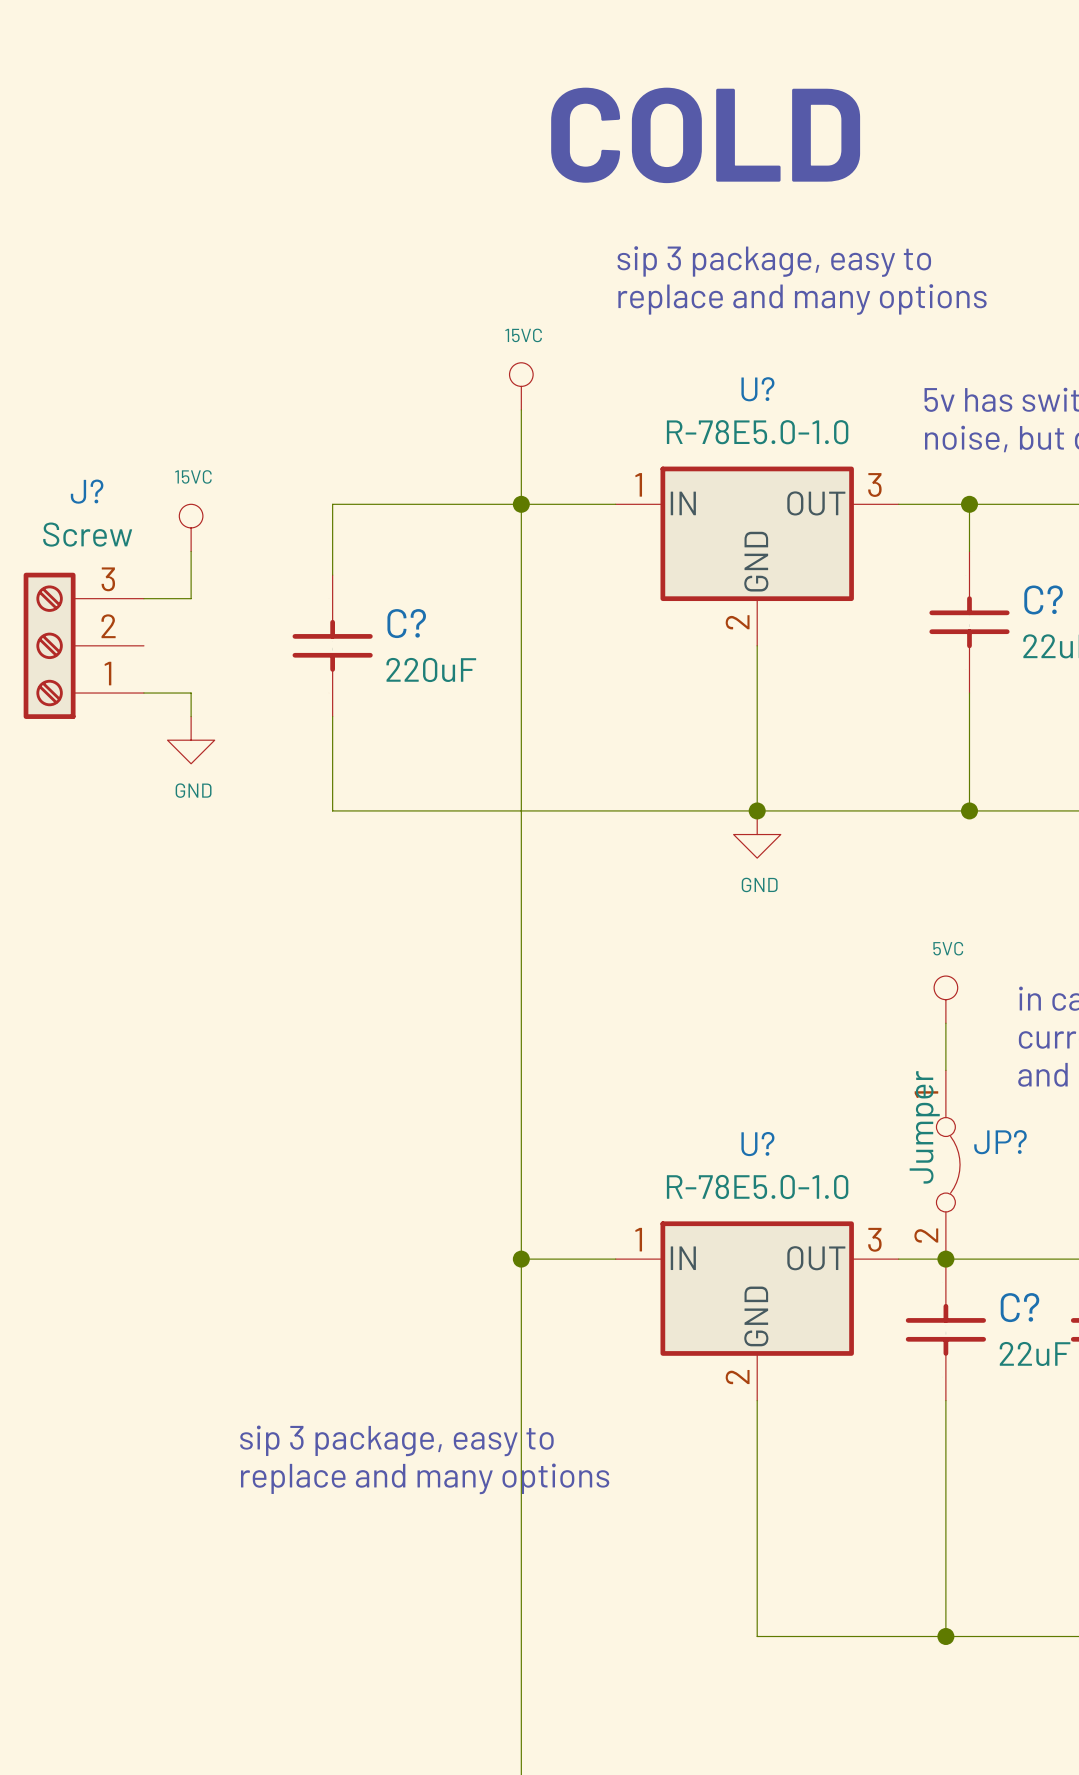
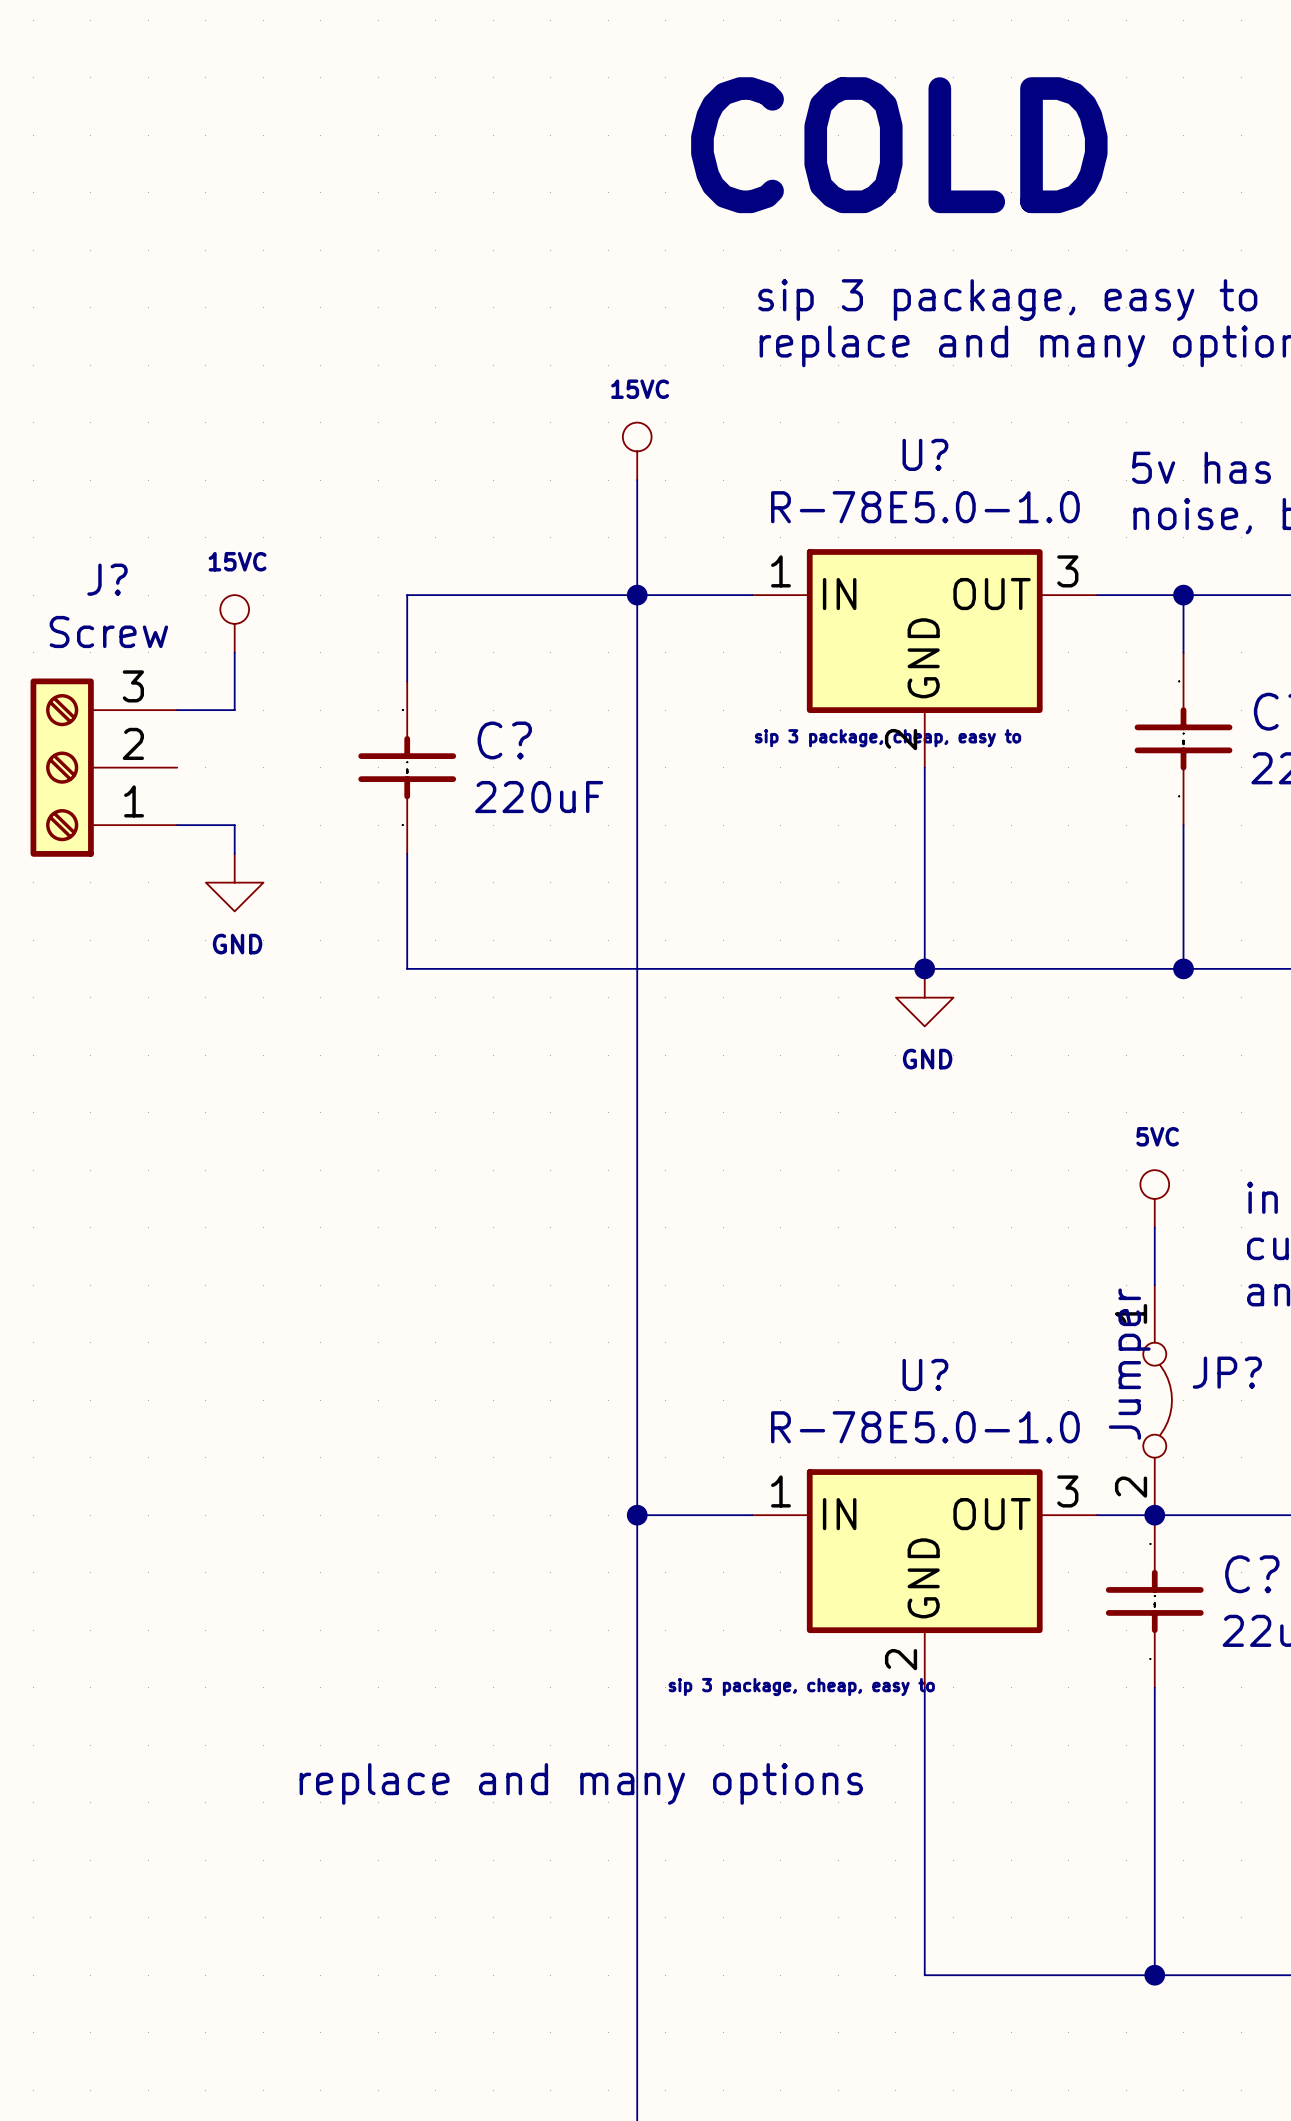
text: none -> sip 3 package, cheap, easy to (888, 738)
text: none -> sip 3 package, cheap, easy to (801, 1687)
text: sip 3 package, easy to (396, 1440) -> none

